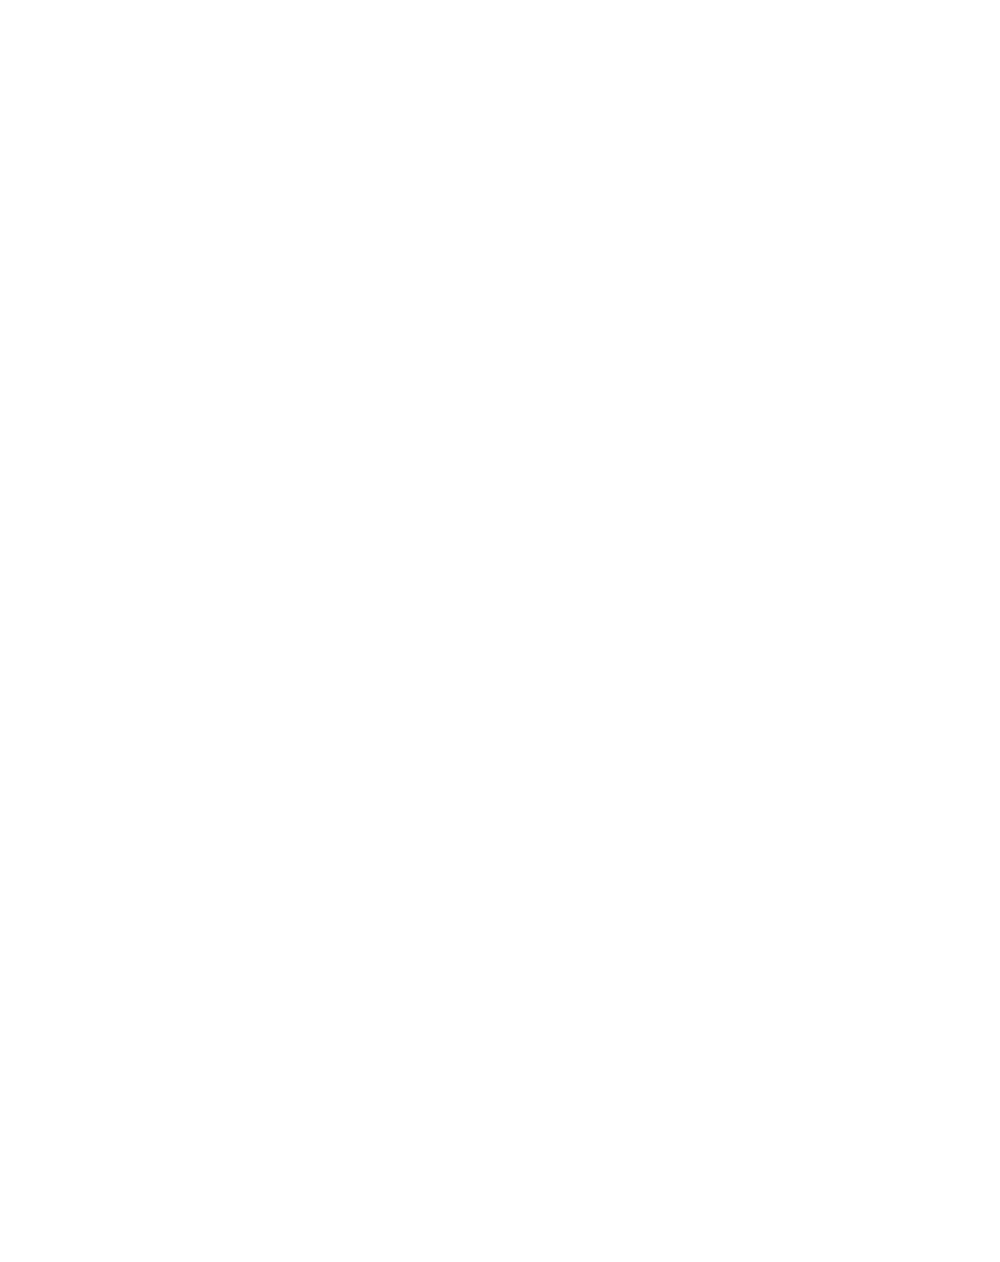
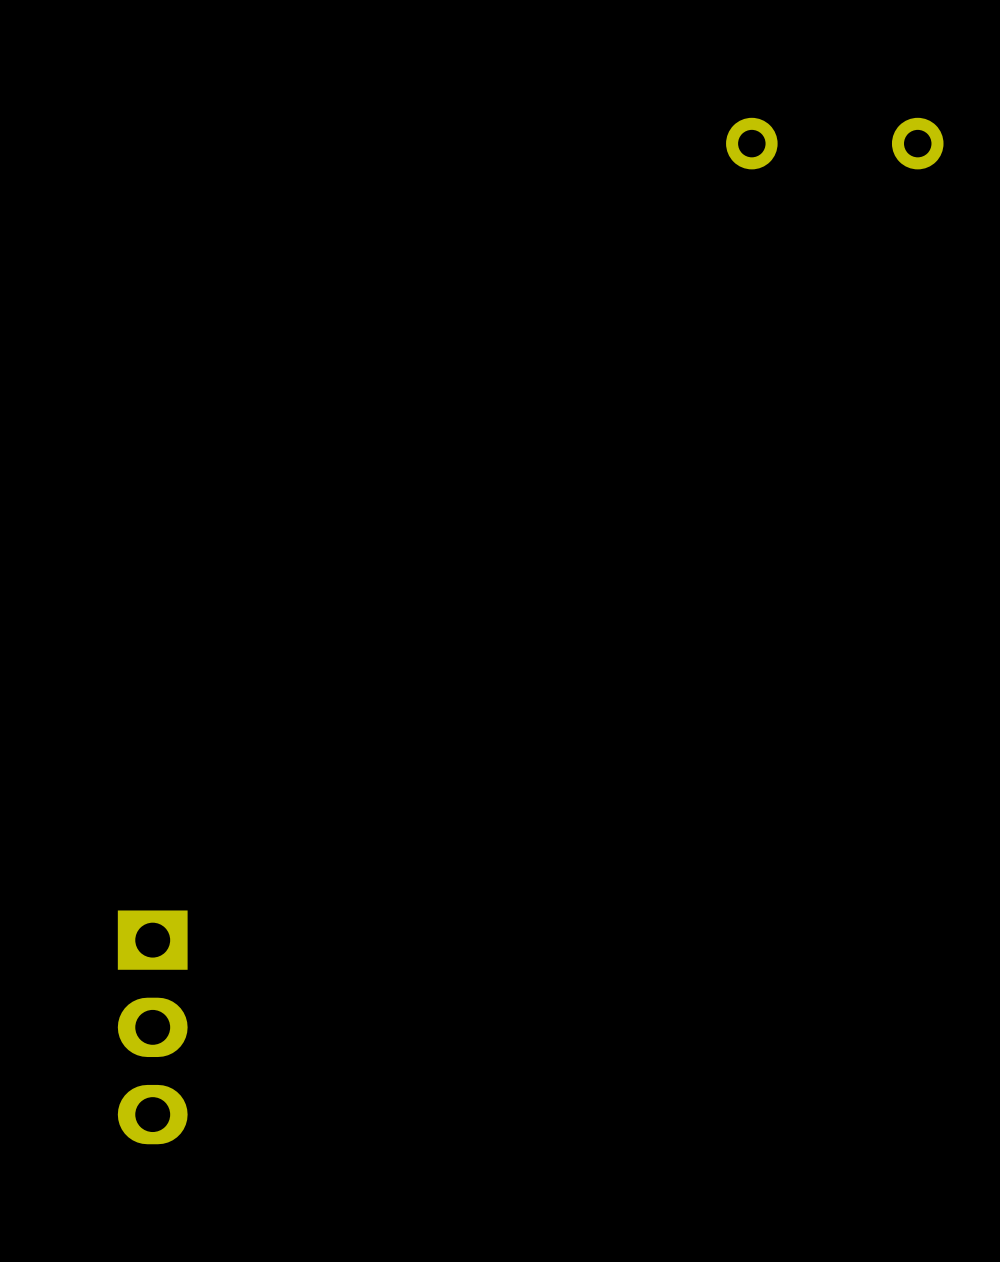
part: none -> (751, 143)
part: none -> (917, 143)
part: none -> (152, 1027)

